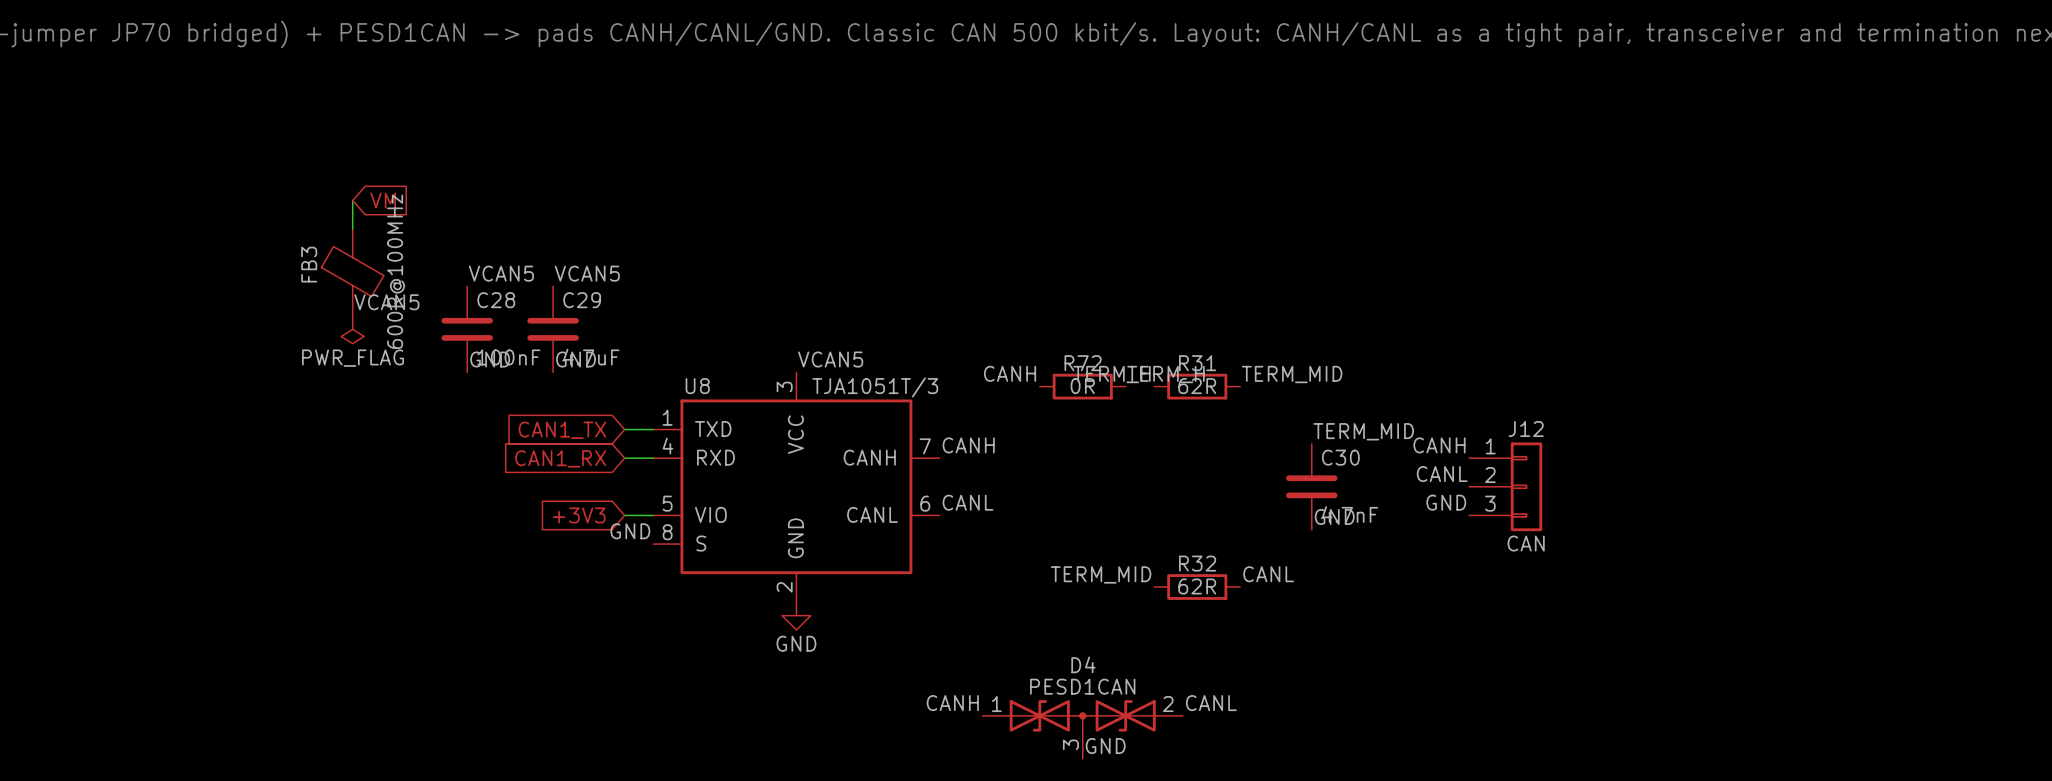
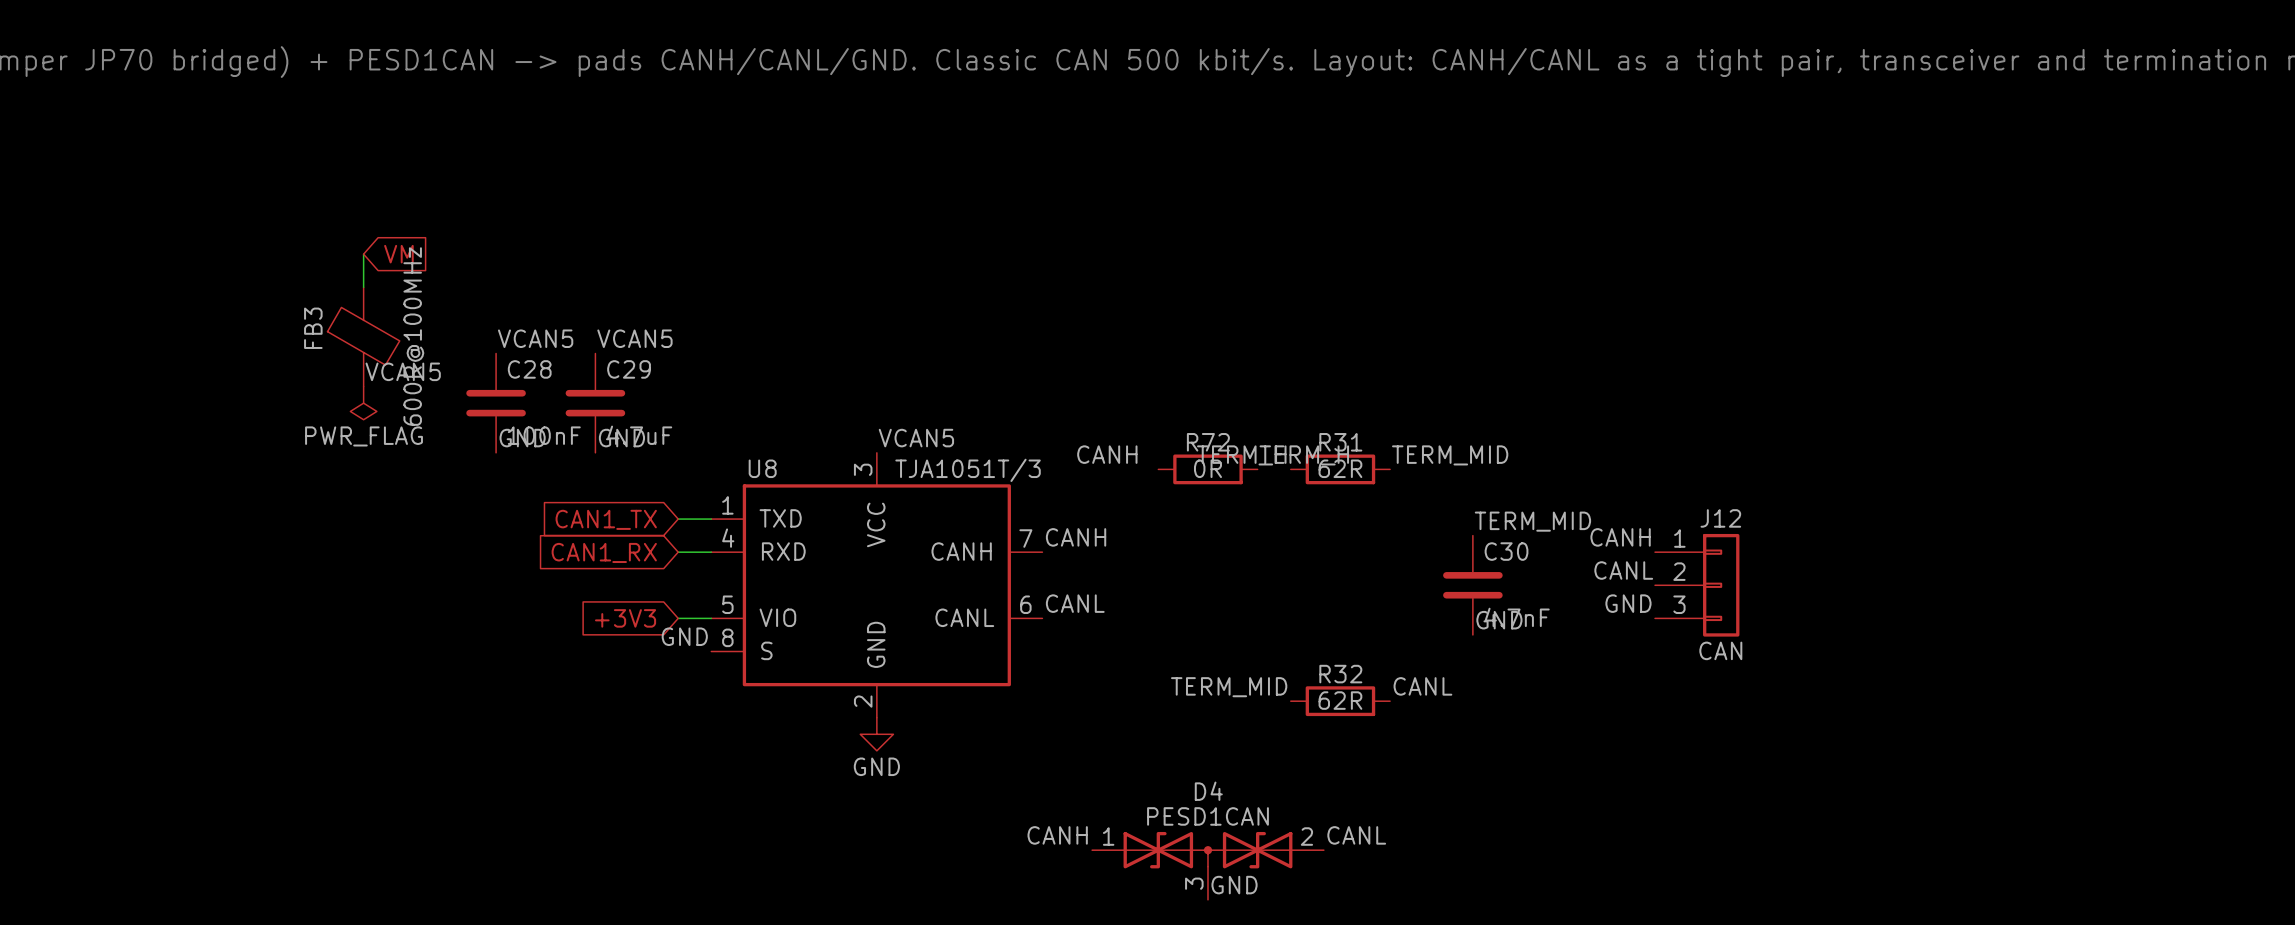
label position: CANH (1010, 373) -> CANH (1107, 454)

